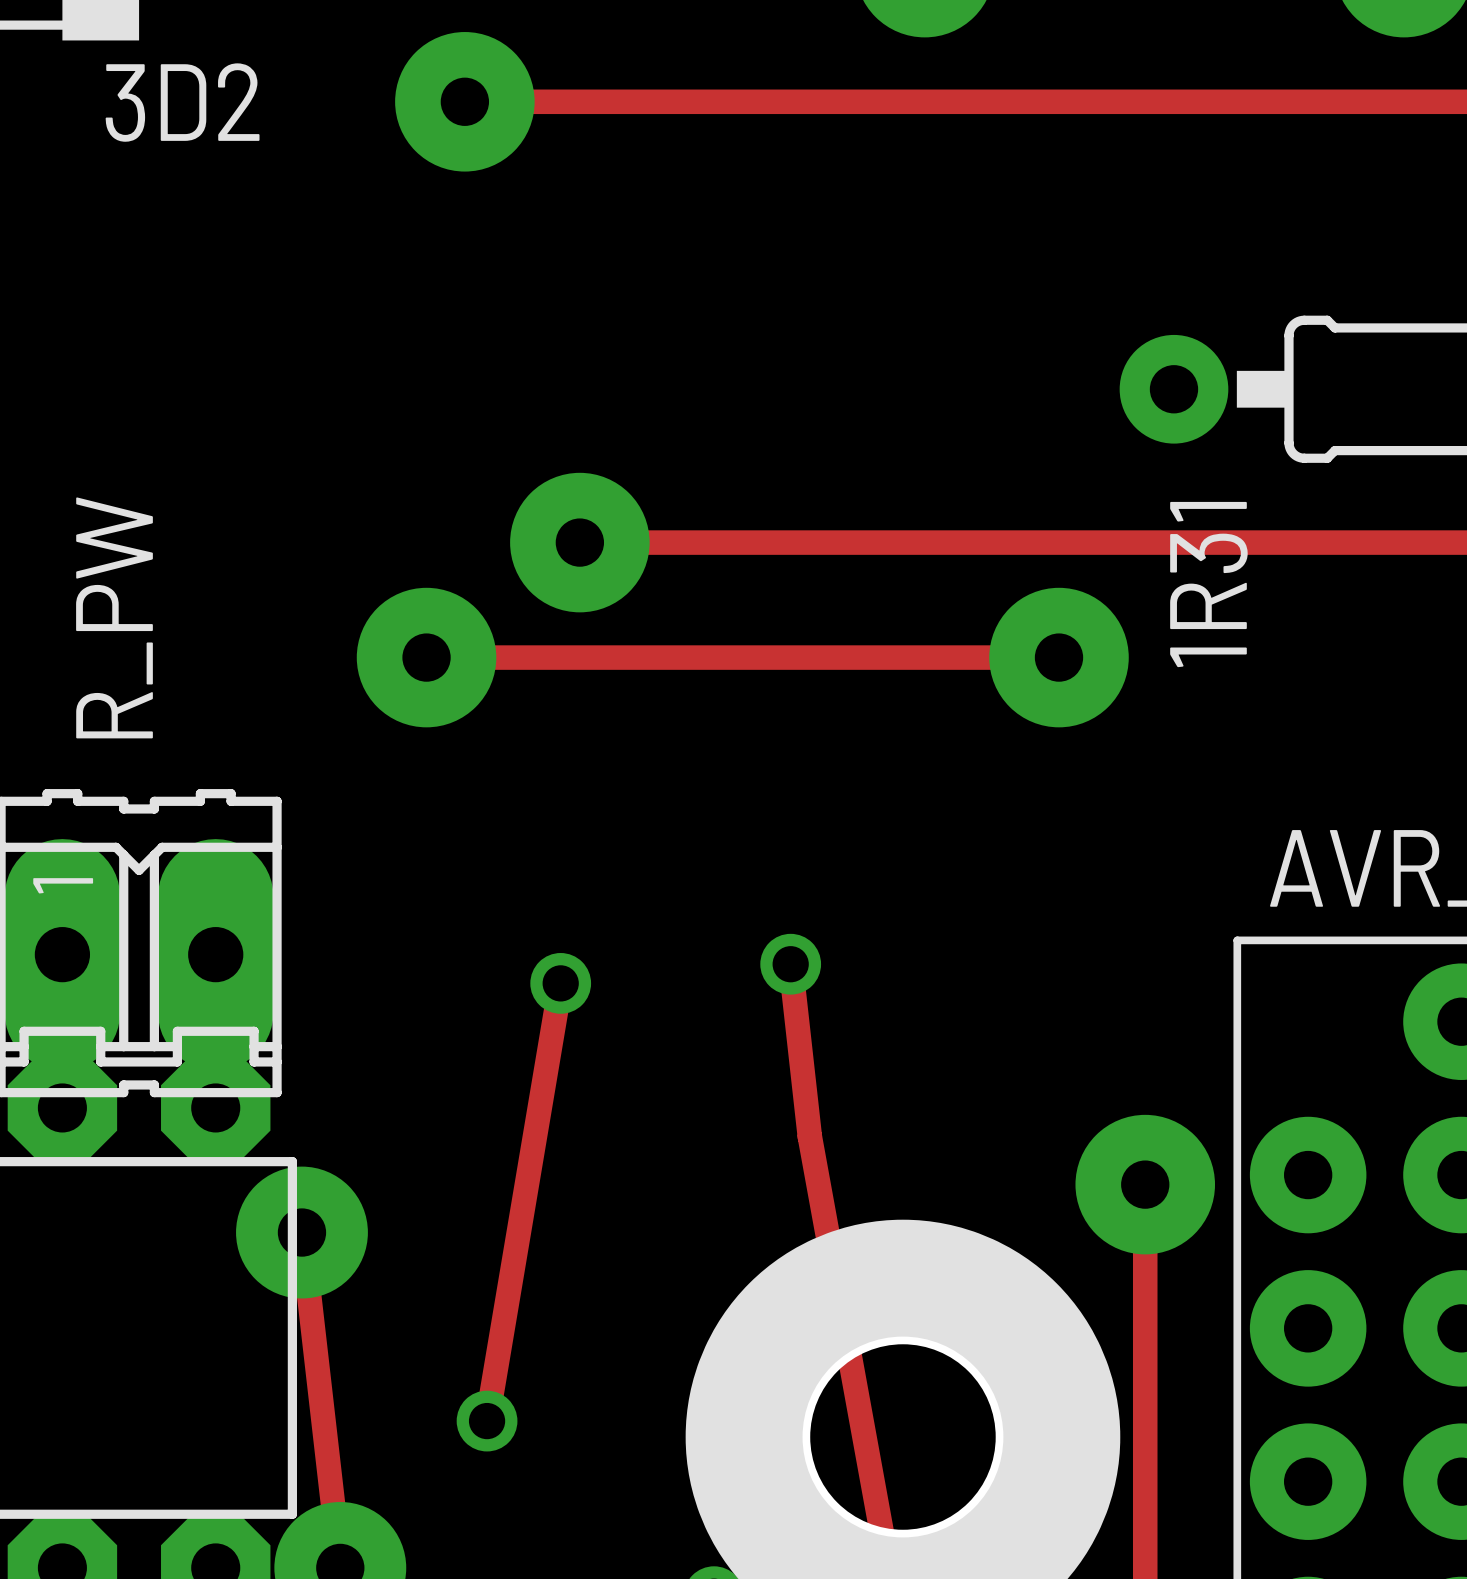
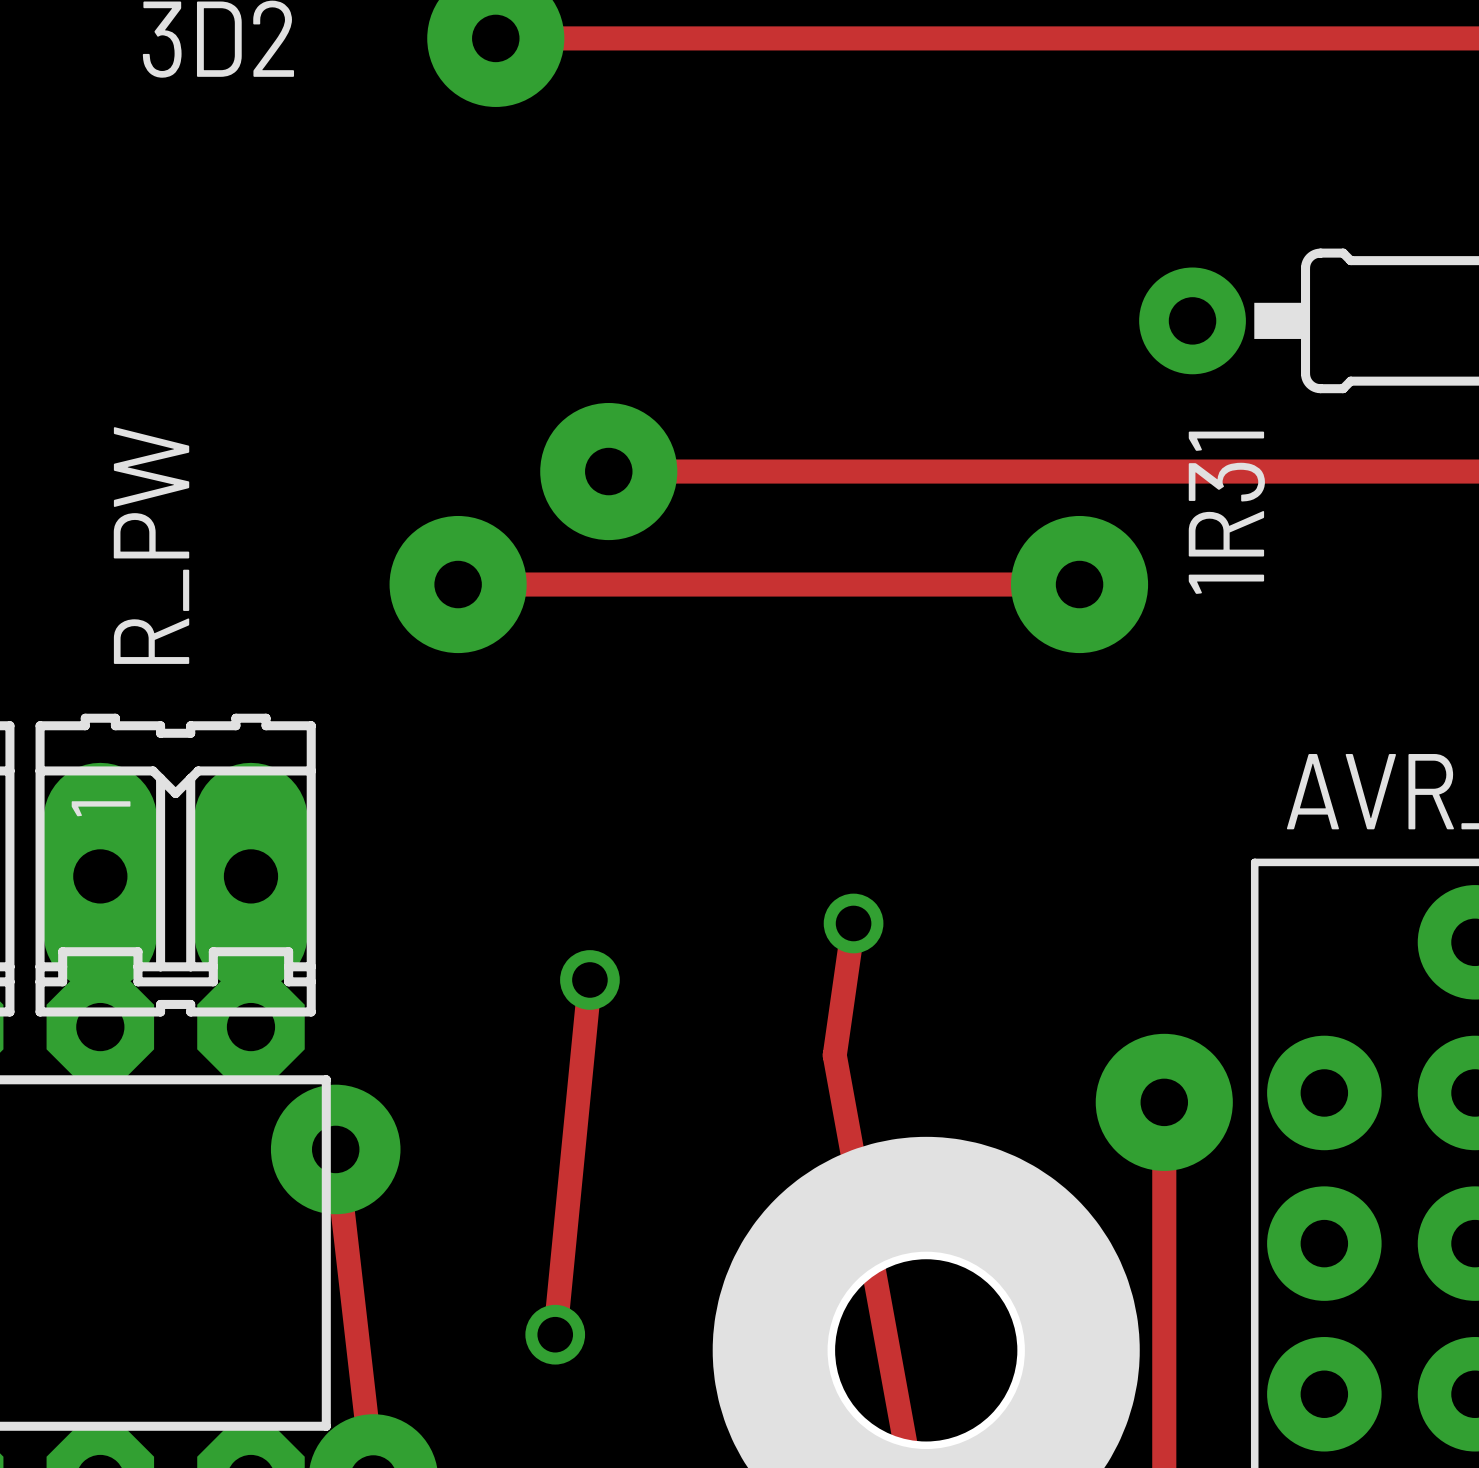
track: (790, 964) (809, 1136) -> (853, 923) (834, 1055)
via position: (790, 964) -> (853, 923)
track: (560, 983) (487, 1421) -> none
via position: (560, 983) -> (589, 979)
track: none -> (589, 979) (555, 1334)
via position: (487, 1421) -> (555, 1334)

